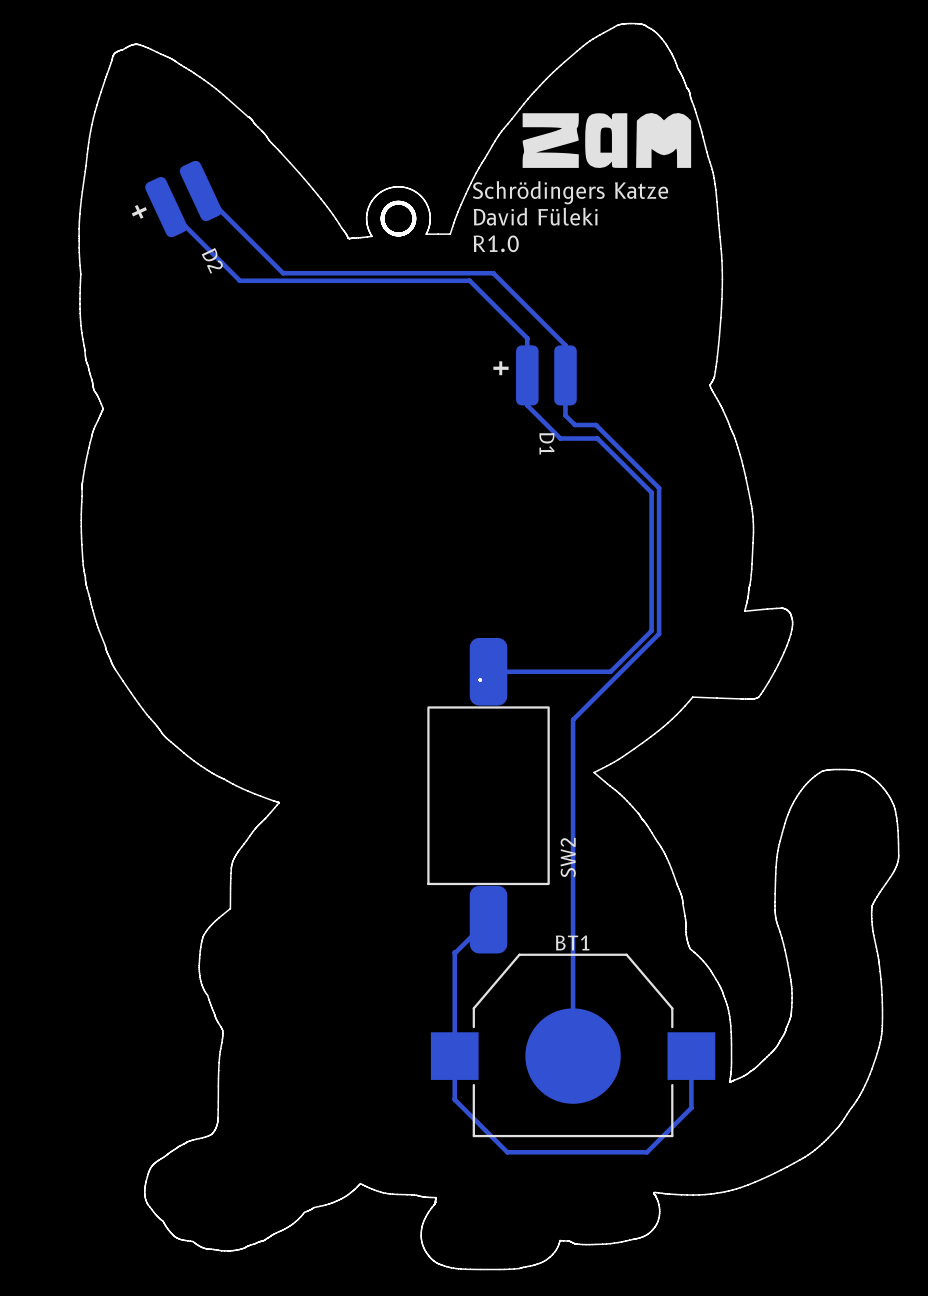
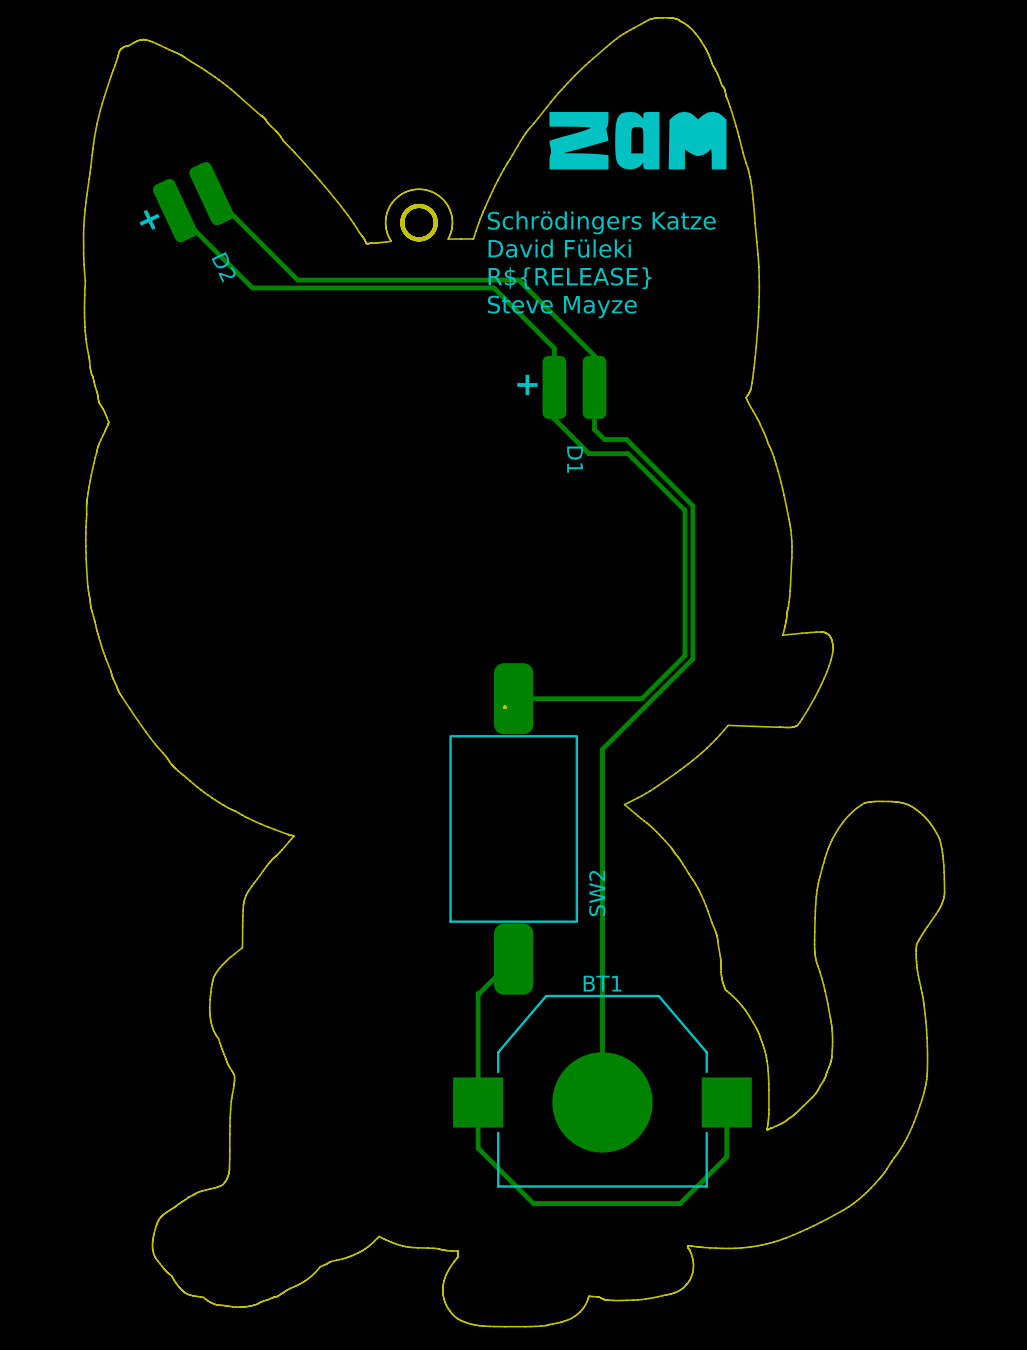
text: Schrödingers Katze (570, 192) -> none
text: David Füleki (535, 216) -> Schrödingers Katze (601, 222)
text: R1.0 (496, 243) -> David Füleki (559, 248)
text: none -> R${RELEASE} (570, 278)
text: none -> Steve Mayze (562, 306)

